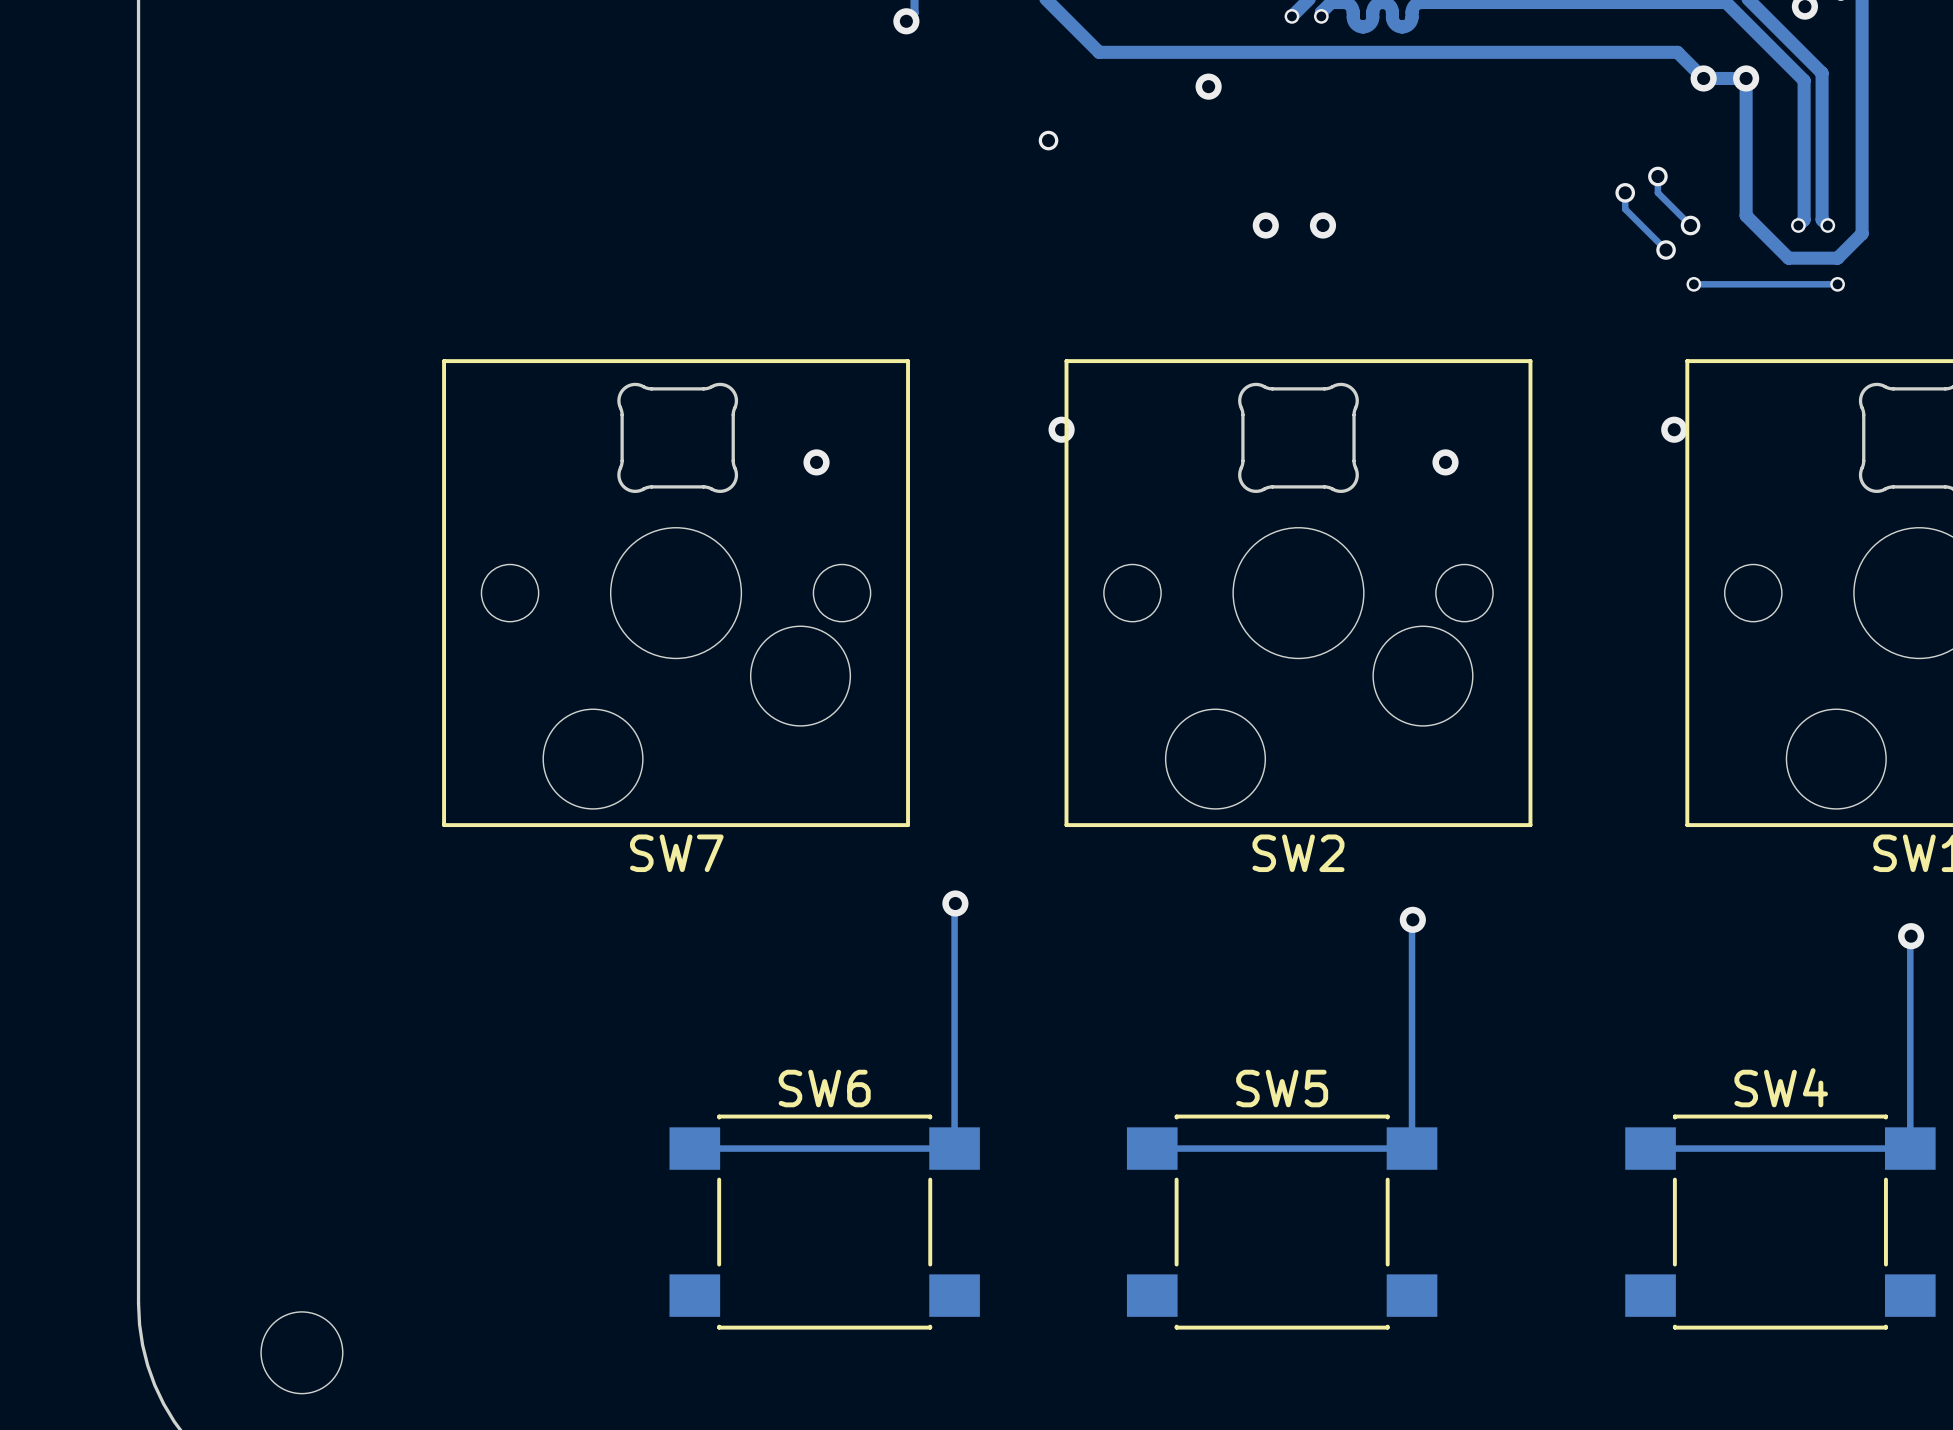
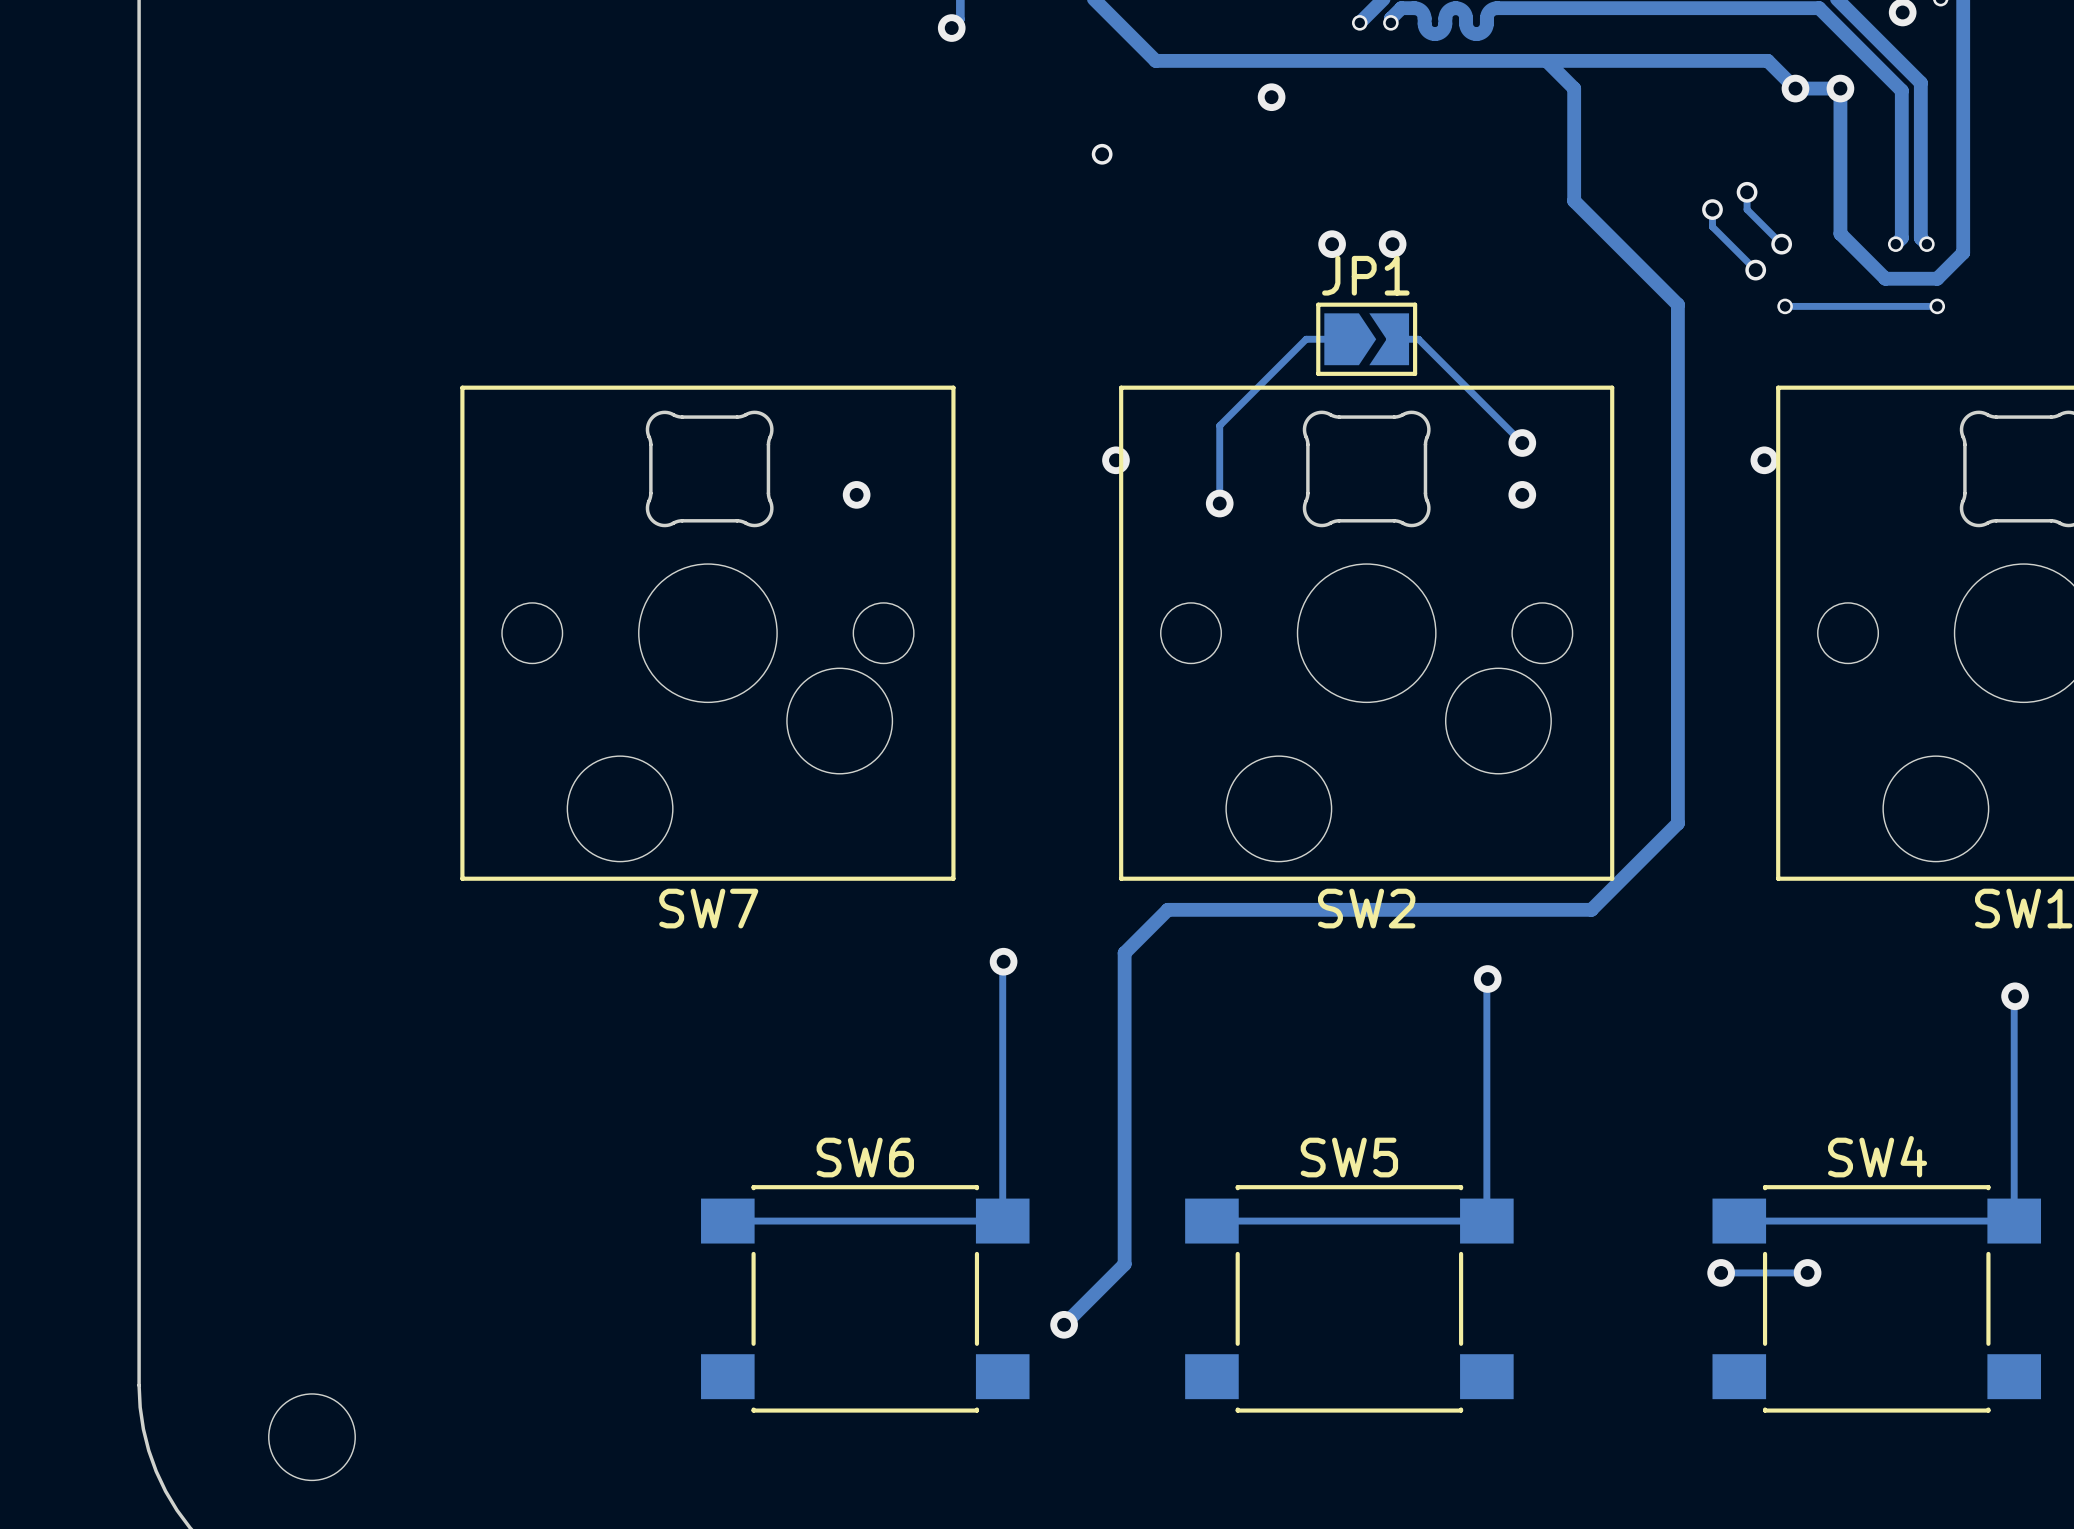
track: none -> (1546, 60) (1574, 88) (1574, 200) (1677, 304) (1677, 823) (1591, 909) (1167, 909) (1124, 953) (1124, 1264) (1064, 1324)
track: none -> (1341, 339) (1306, 339) (1219, 425) (1219, 503)
JP1: none -> (1366, 339)
track: none -> (1391, 339) (1418, 339) (1522, 443)
via: none -> (1522, 443)
via: none -> (1219, 503)
via: none -> (1721, 1272)
track: none -> (1807, 1272) (1721, 1272)
via: none -> (1807, 1272)
via: none -> (1064, 1324)

